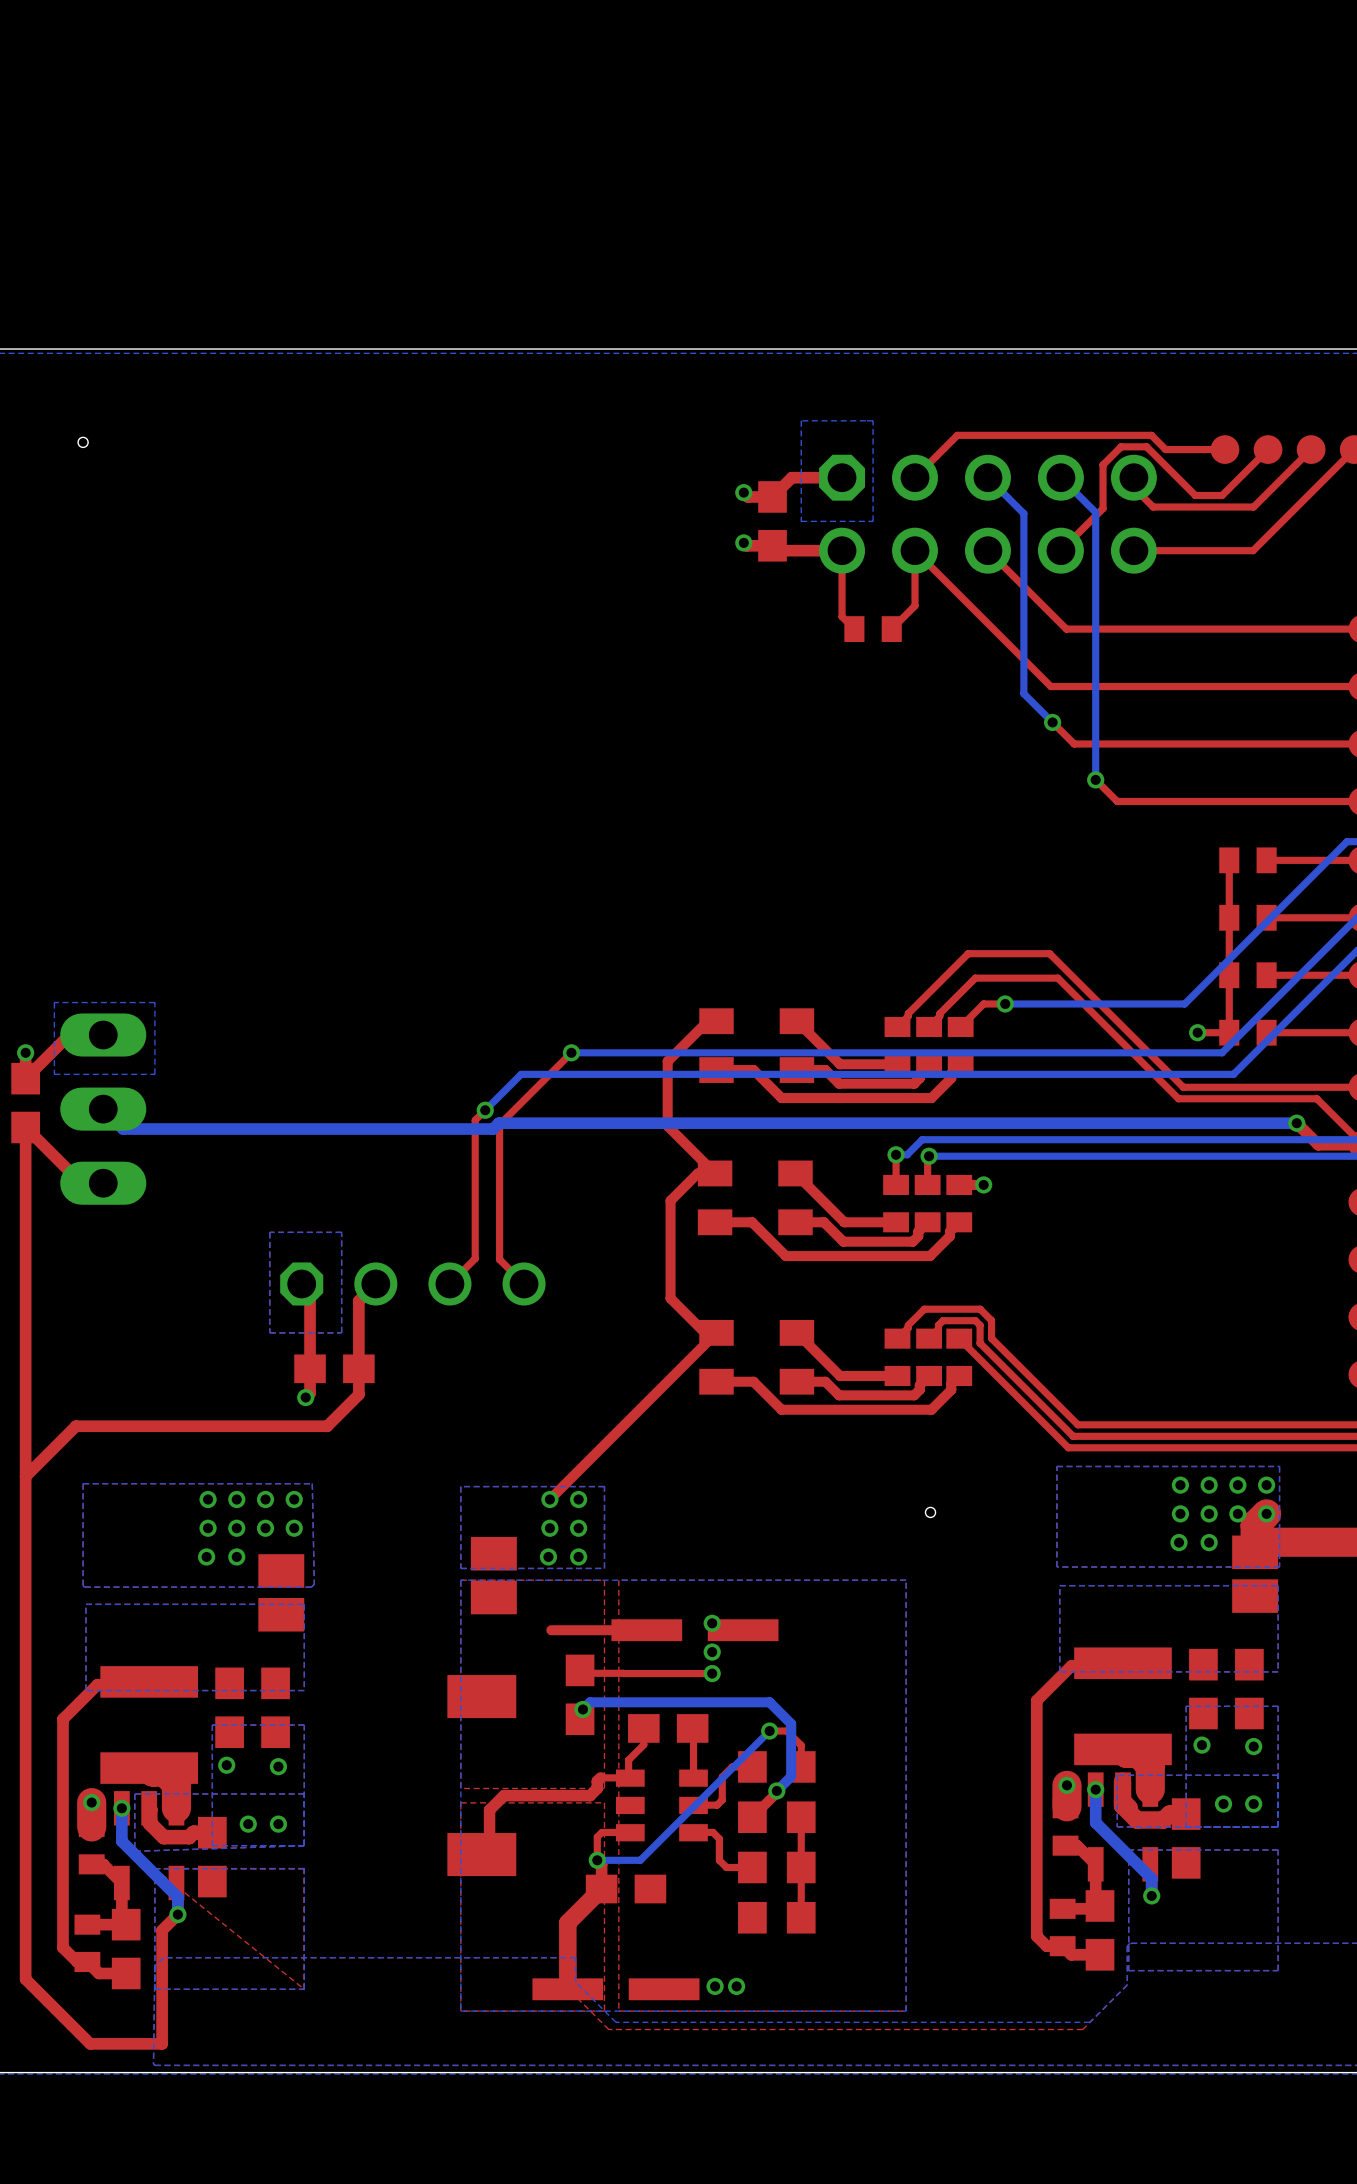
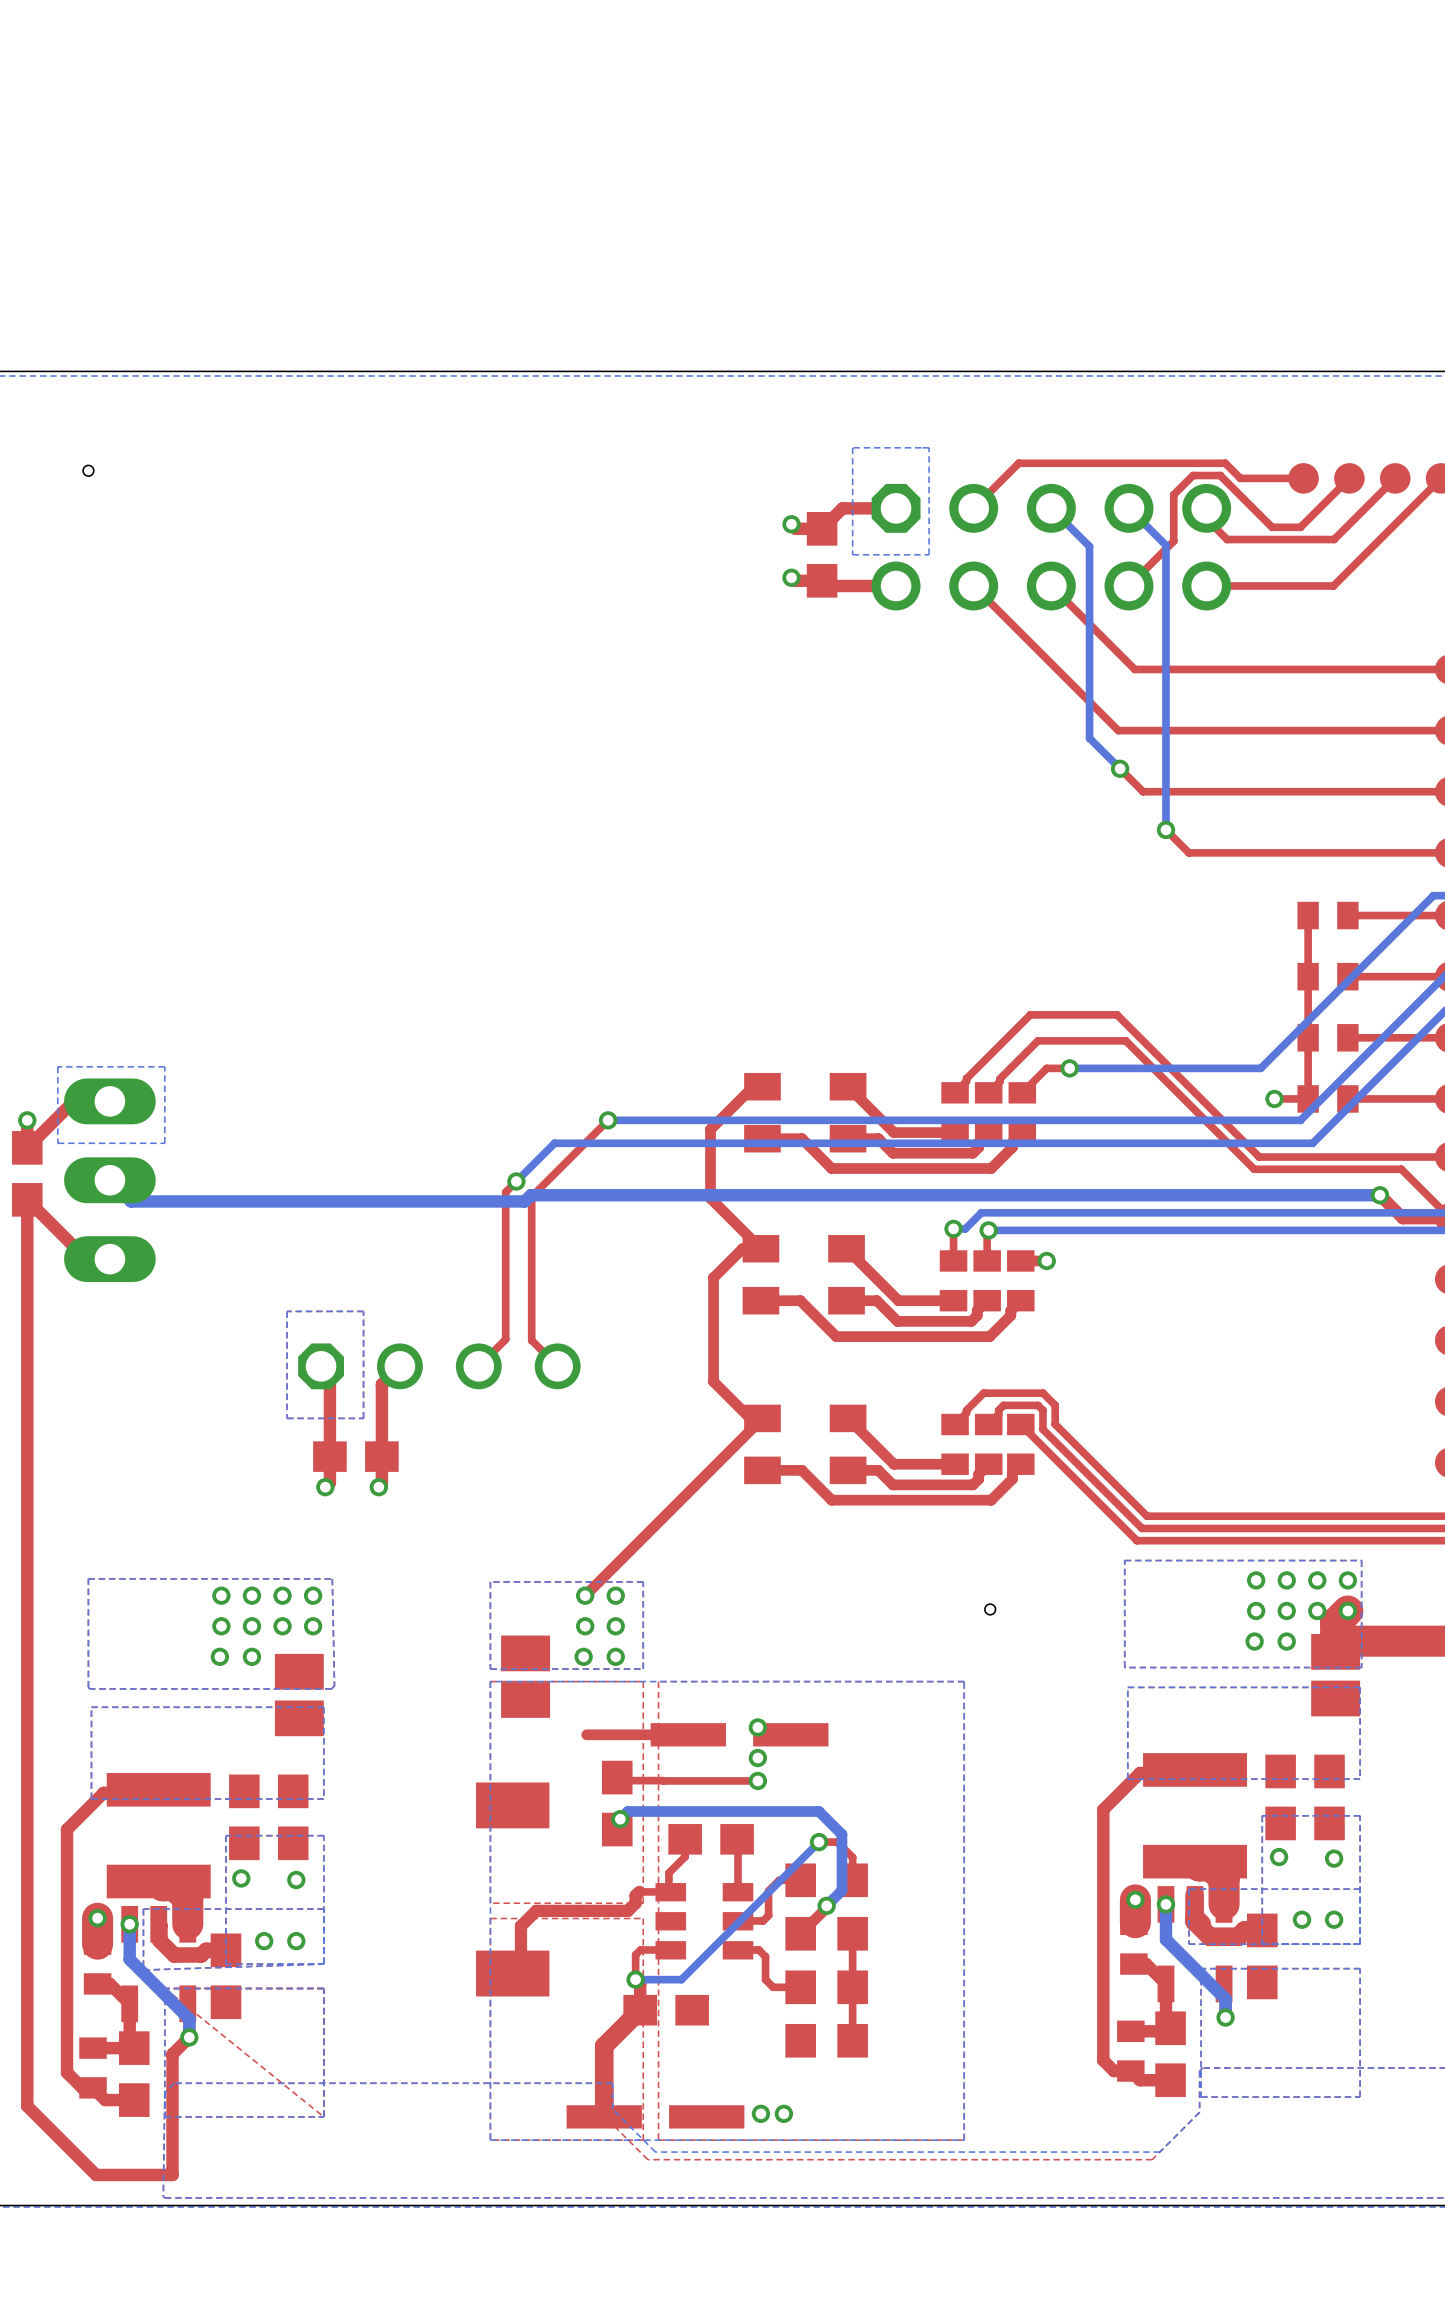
top track: (842, 550) (842, 616) (854, 629) -> none
top track: (915, 550) (915, 605) (891, 629) -> none
part: (873, 629) -> none
top track: (355, 1397) (327, 1426) (75, 1426) (25, 1476) -> none
via: none -> (378, 1487)

